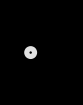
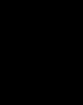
part: (30, 52) -> none

